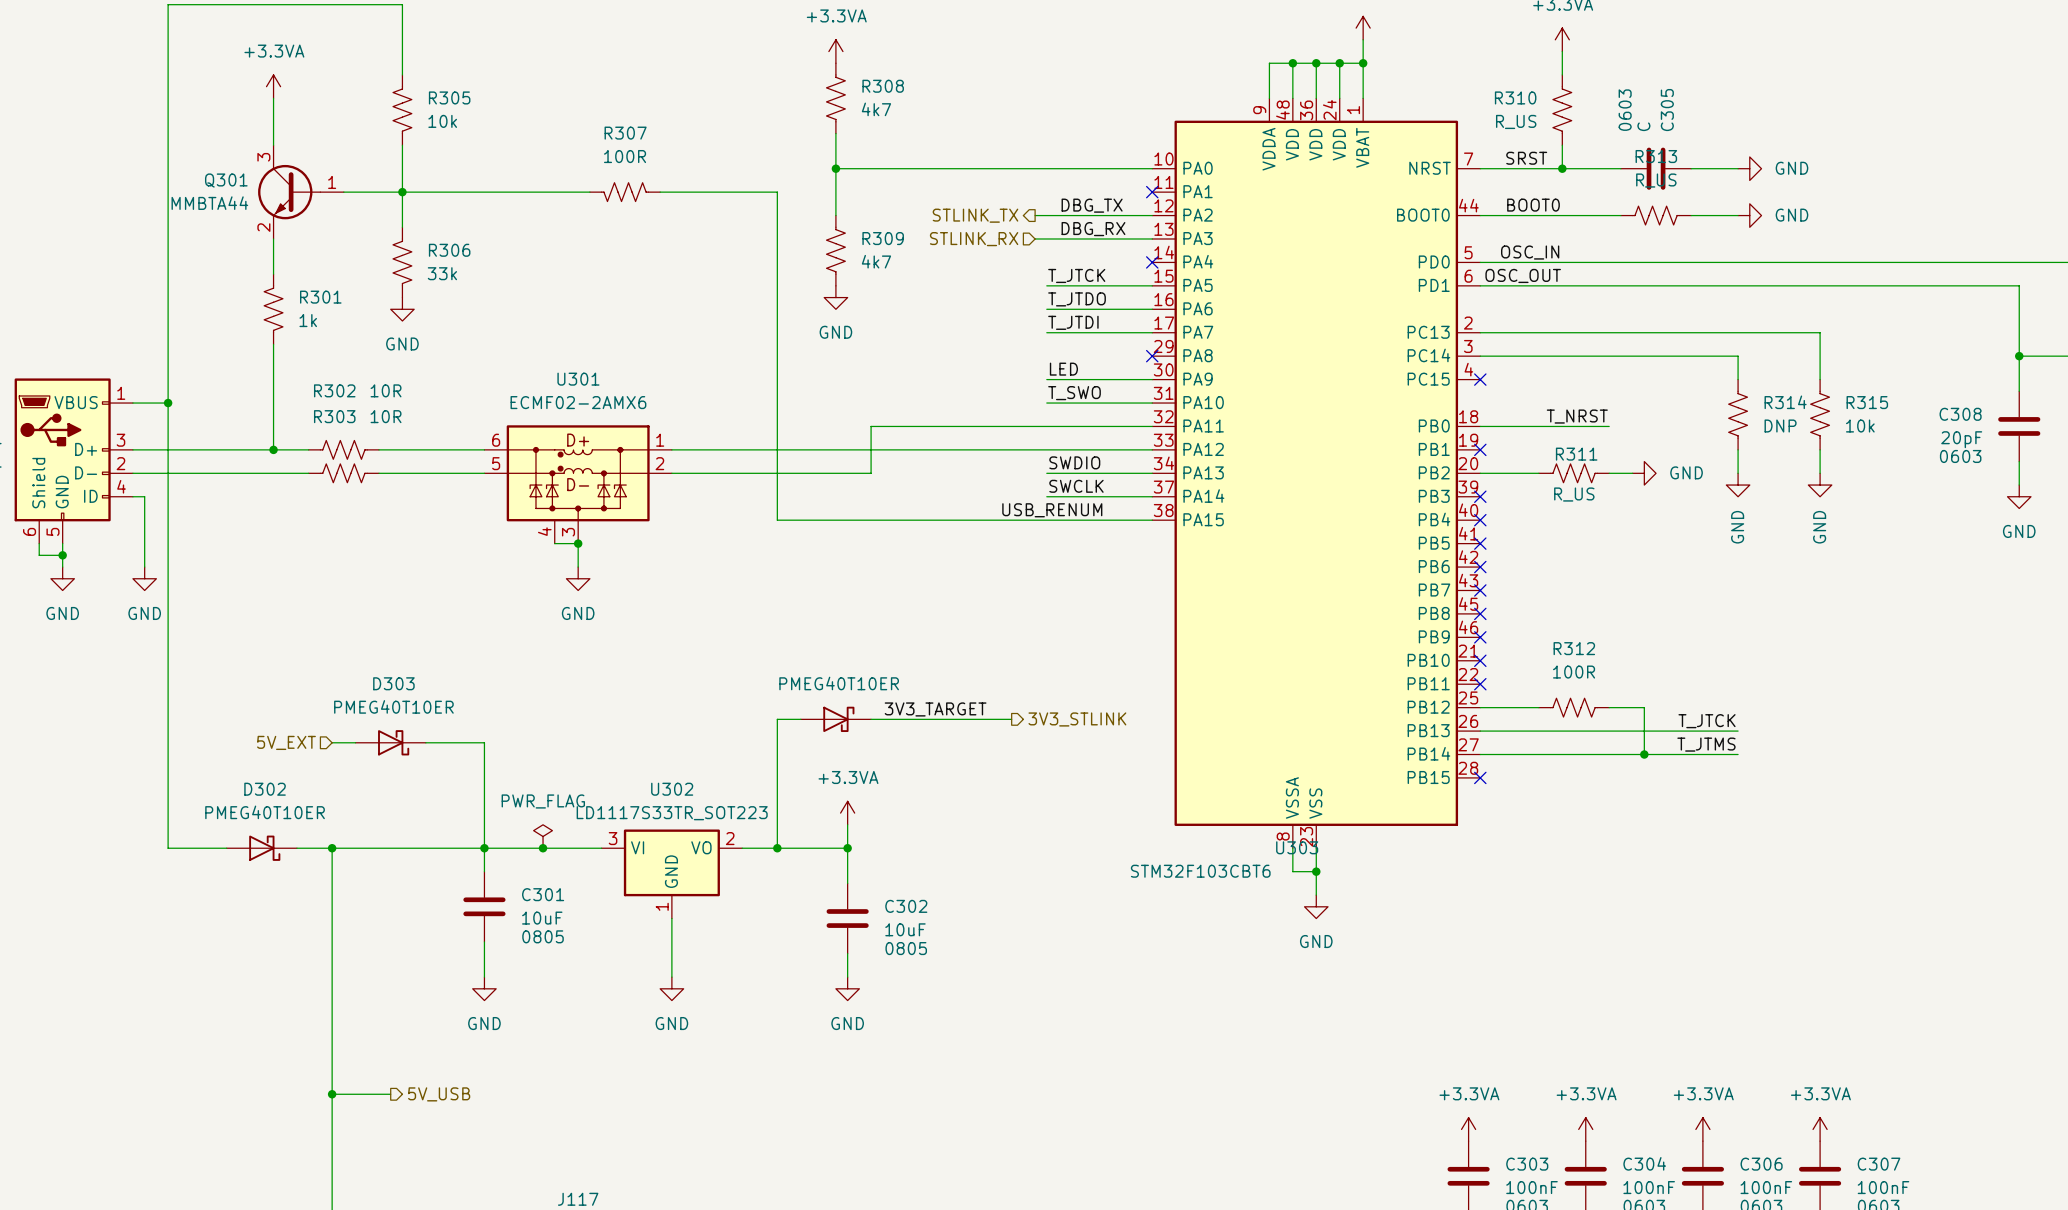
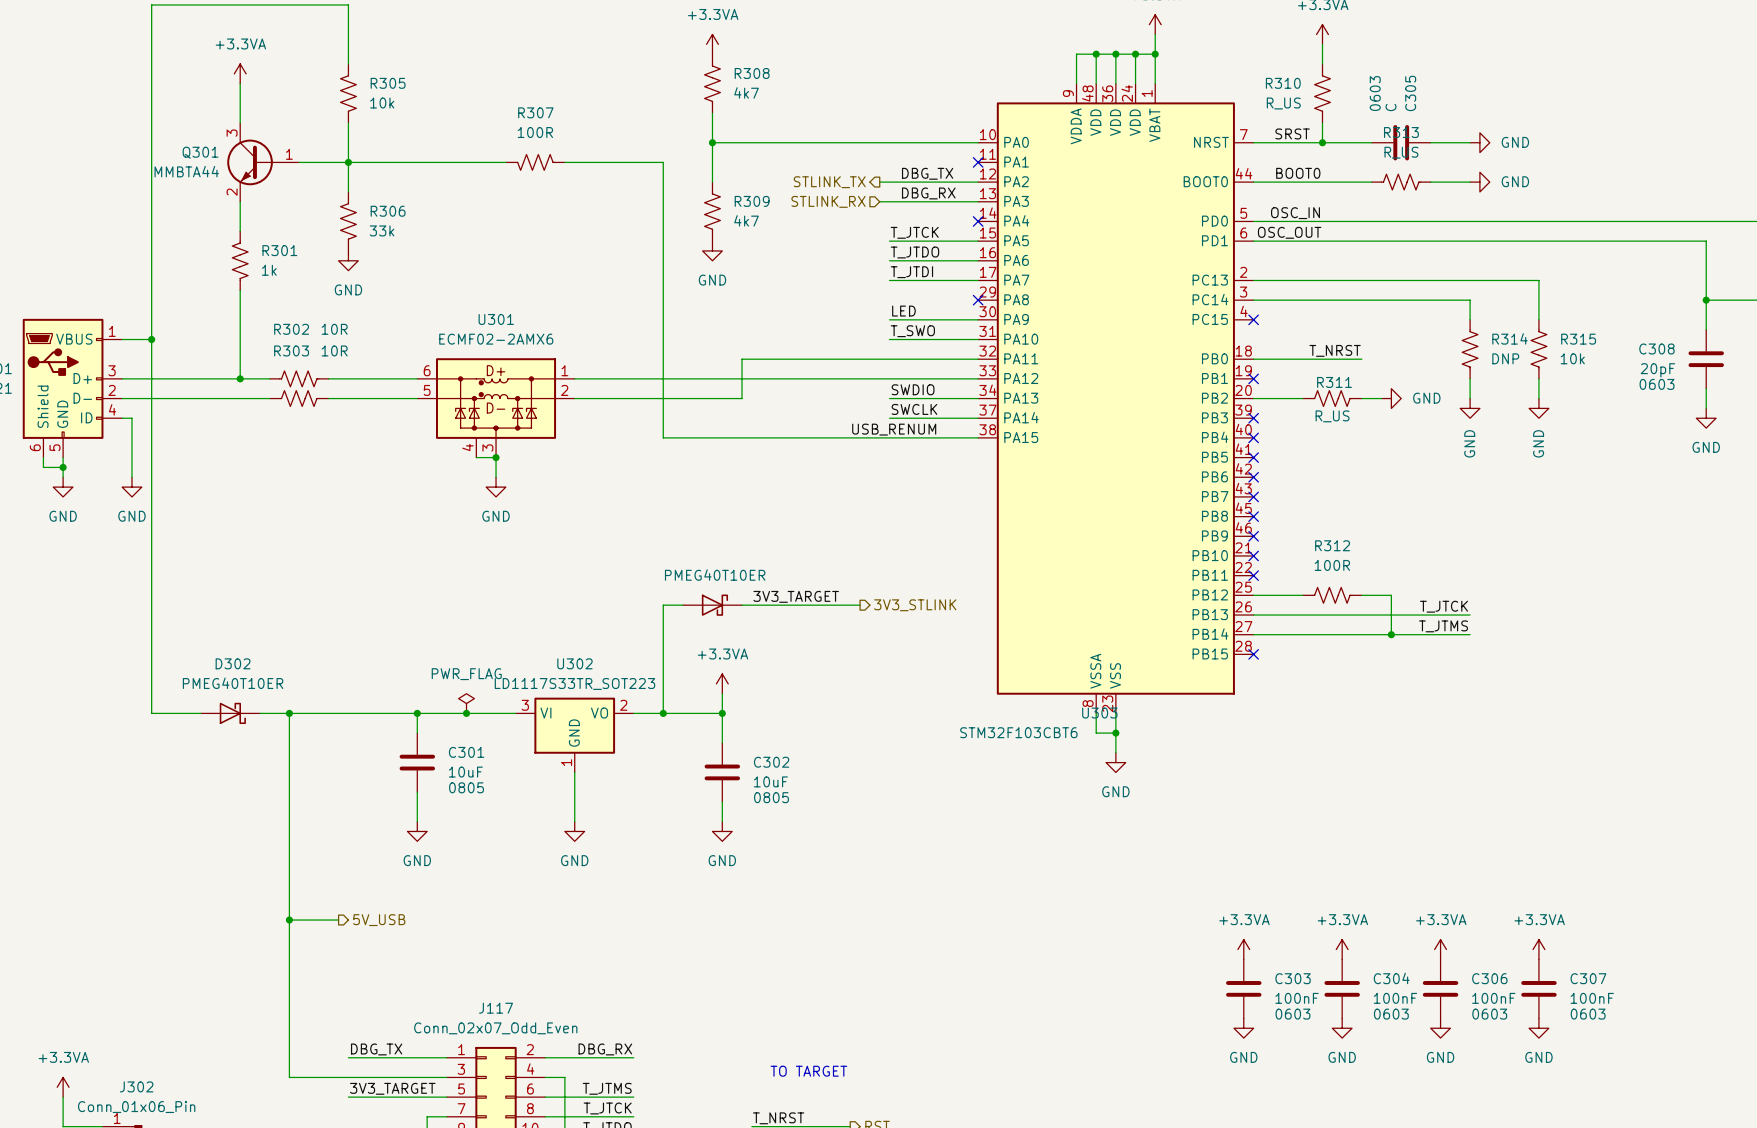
hierarchical label: 5V_EXT (286, 742) -> none
wire: (332, 742) (355, 742) -> none
D303: PMEG40T10ER (390, 742) -> none
wire: (425, 742) (484, 742) (484, 848) -> none

